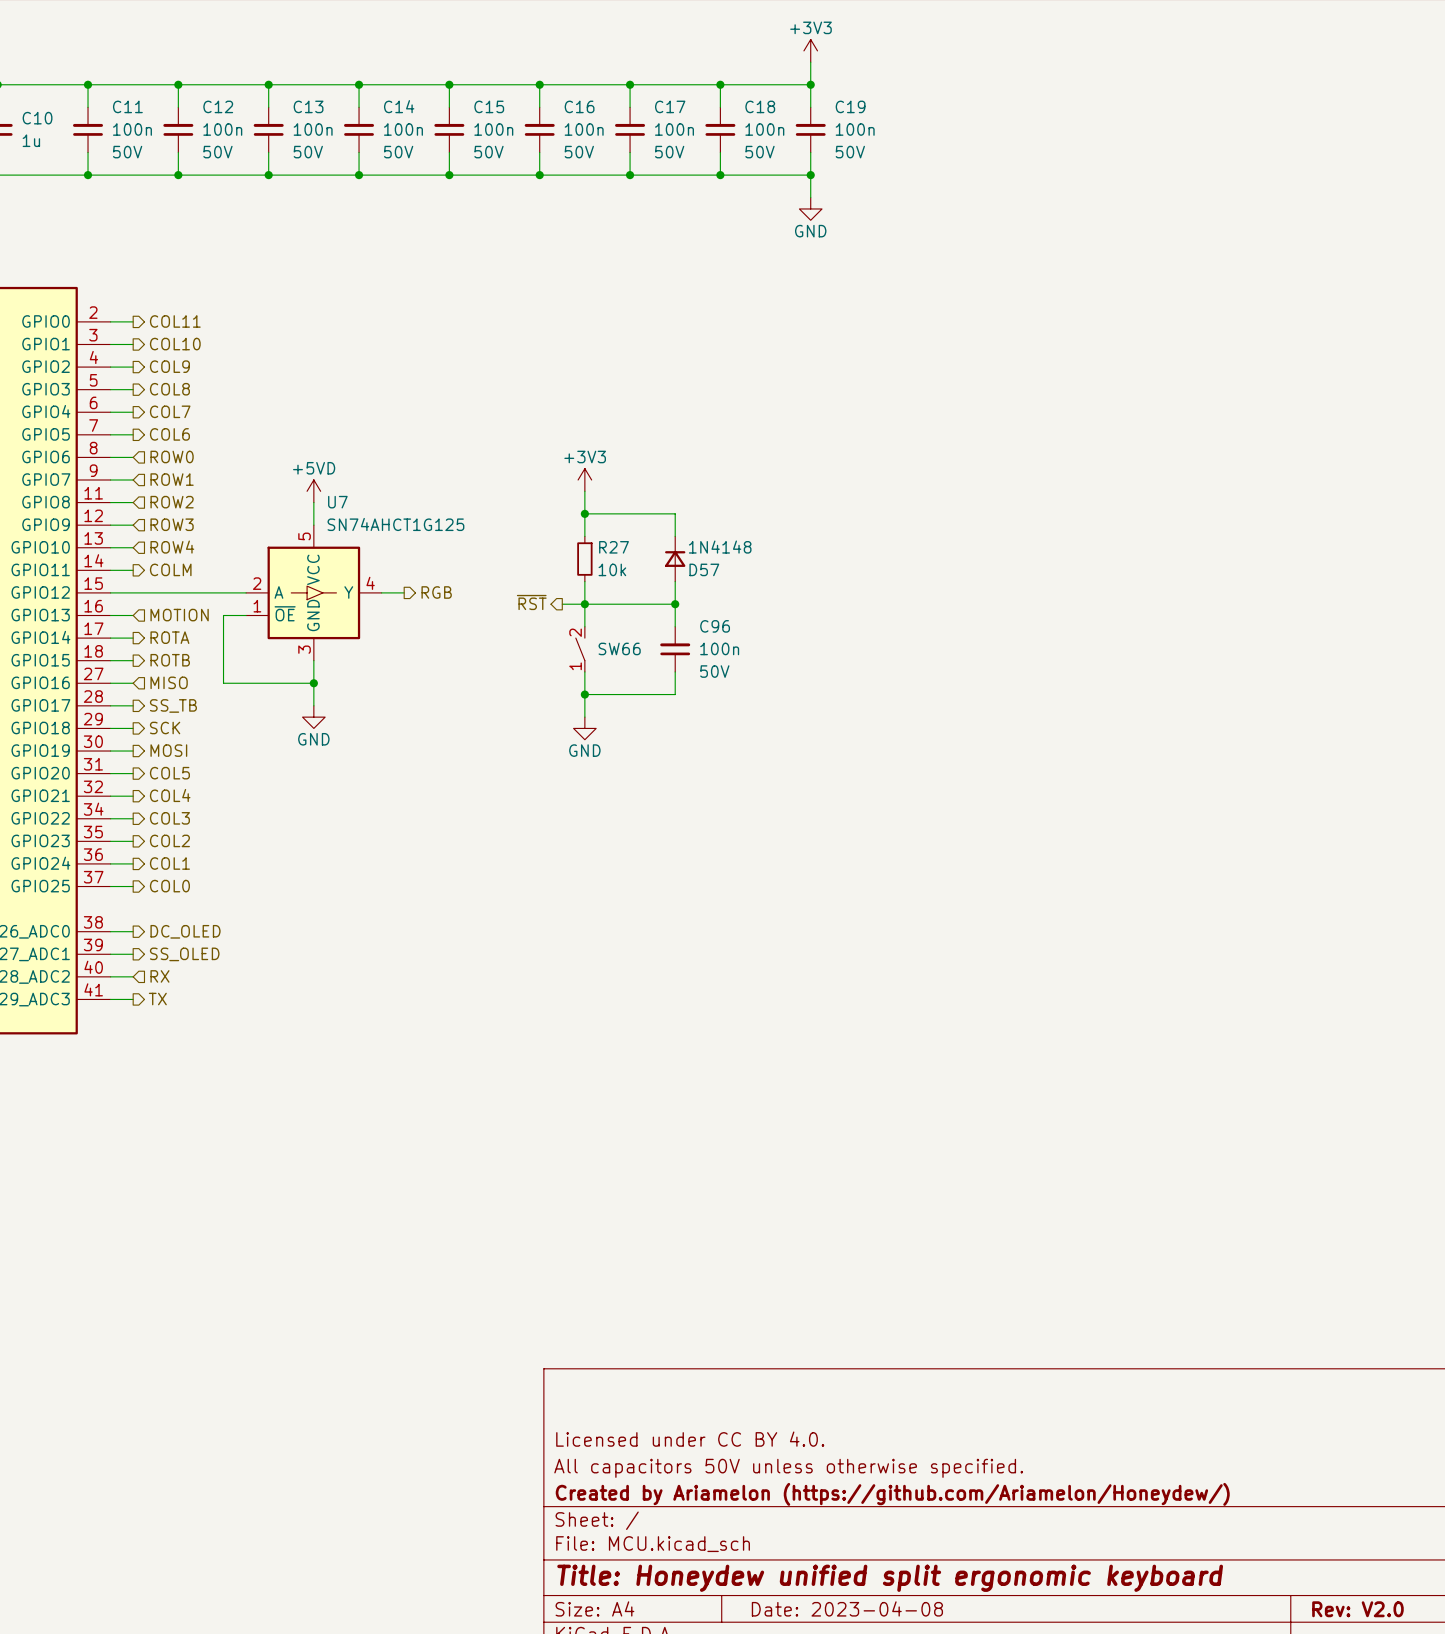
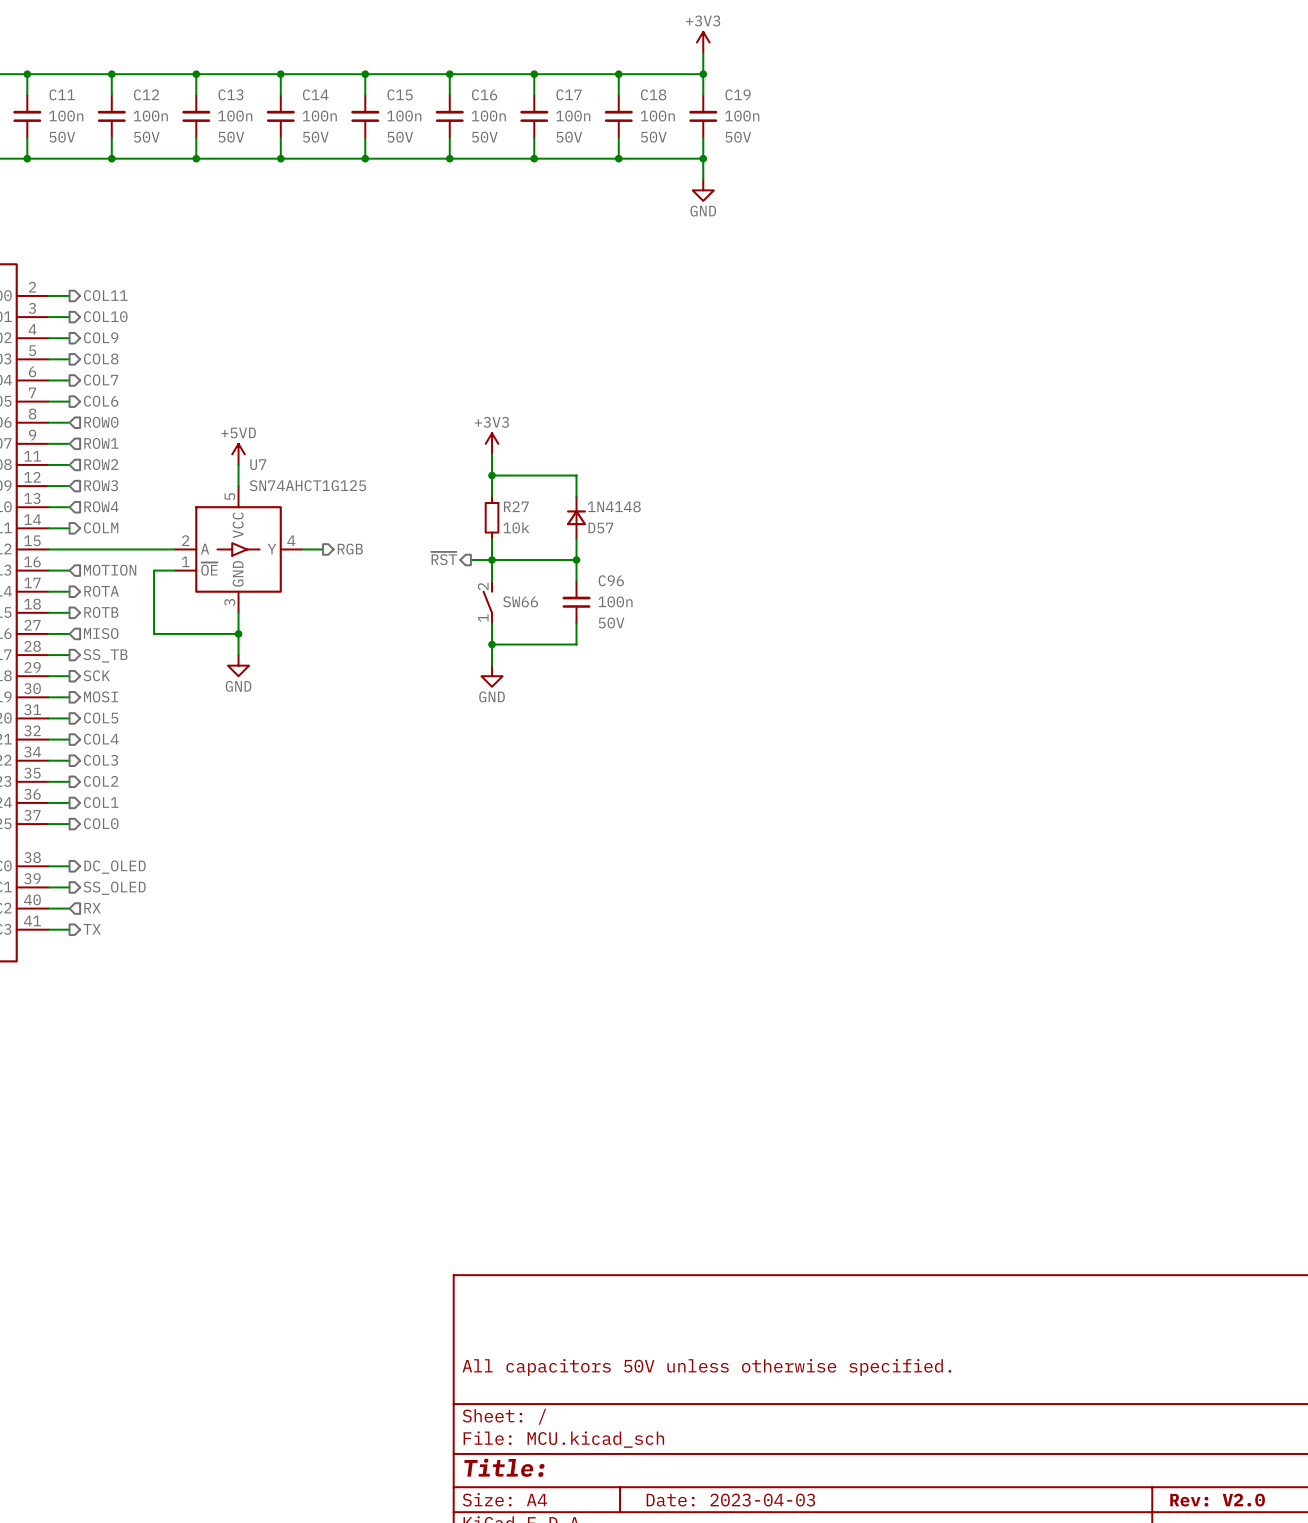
title block: Licensed under CC BY 4.0. (690, 1439) -> none
title block: Created by Ariamelon (https://github.com/Ariamelon/Honeydew/) (892, 1494) -> none
title block: Title: Honeydew unified split ergonomic keyboard (890, 1578) -> Title: (504, 1467)
title block: Date: 2023-04-08 (847, 1608) -> Date: 2023-04-03 (730, 1500)

